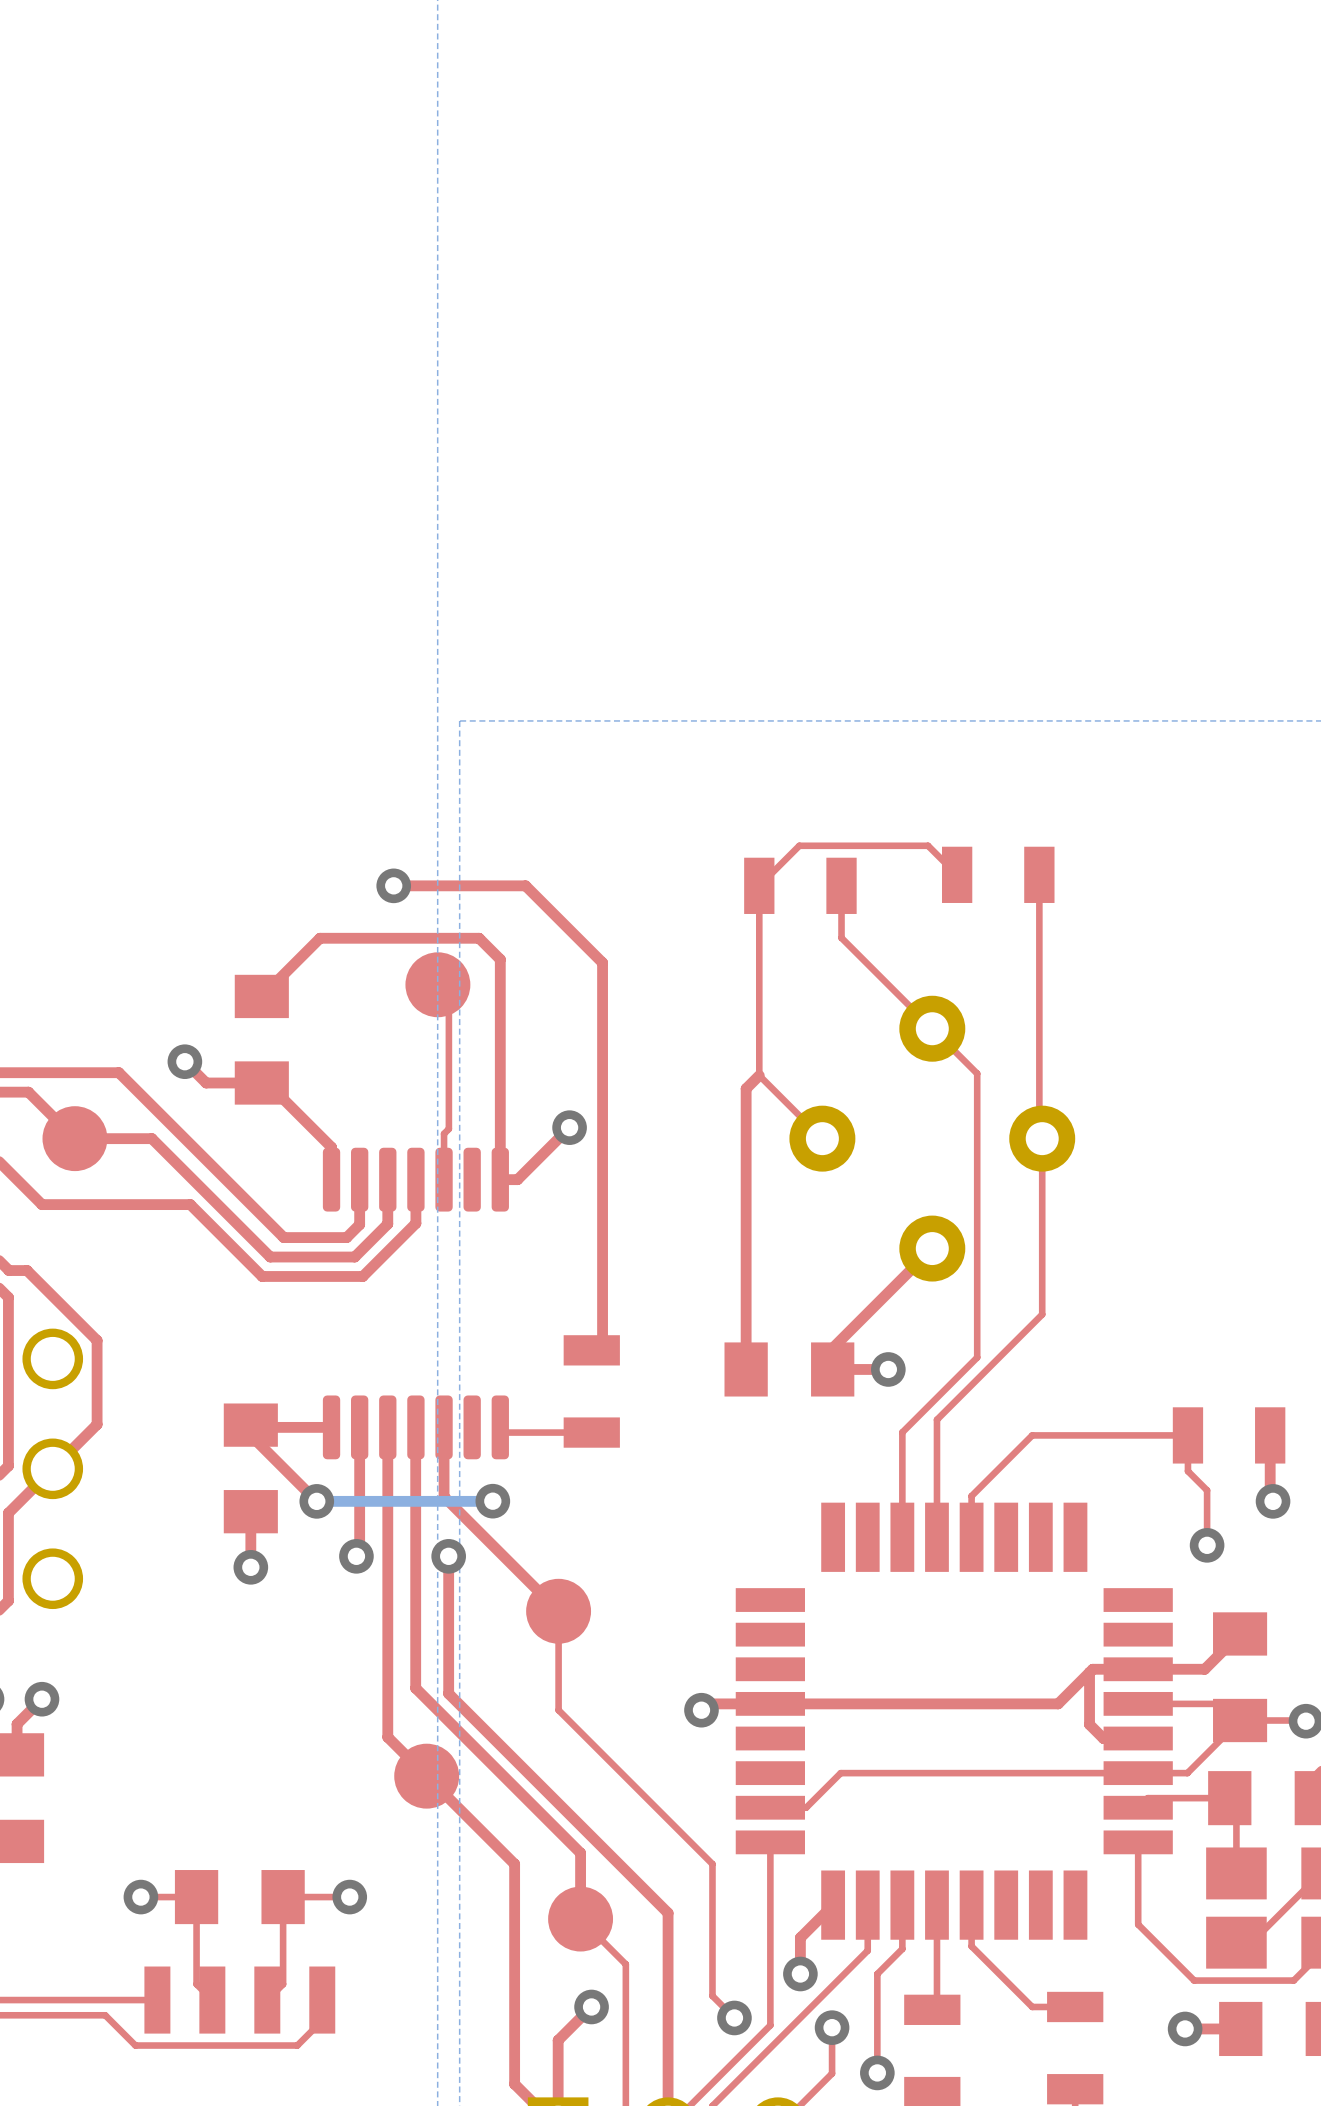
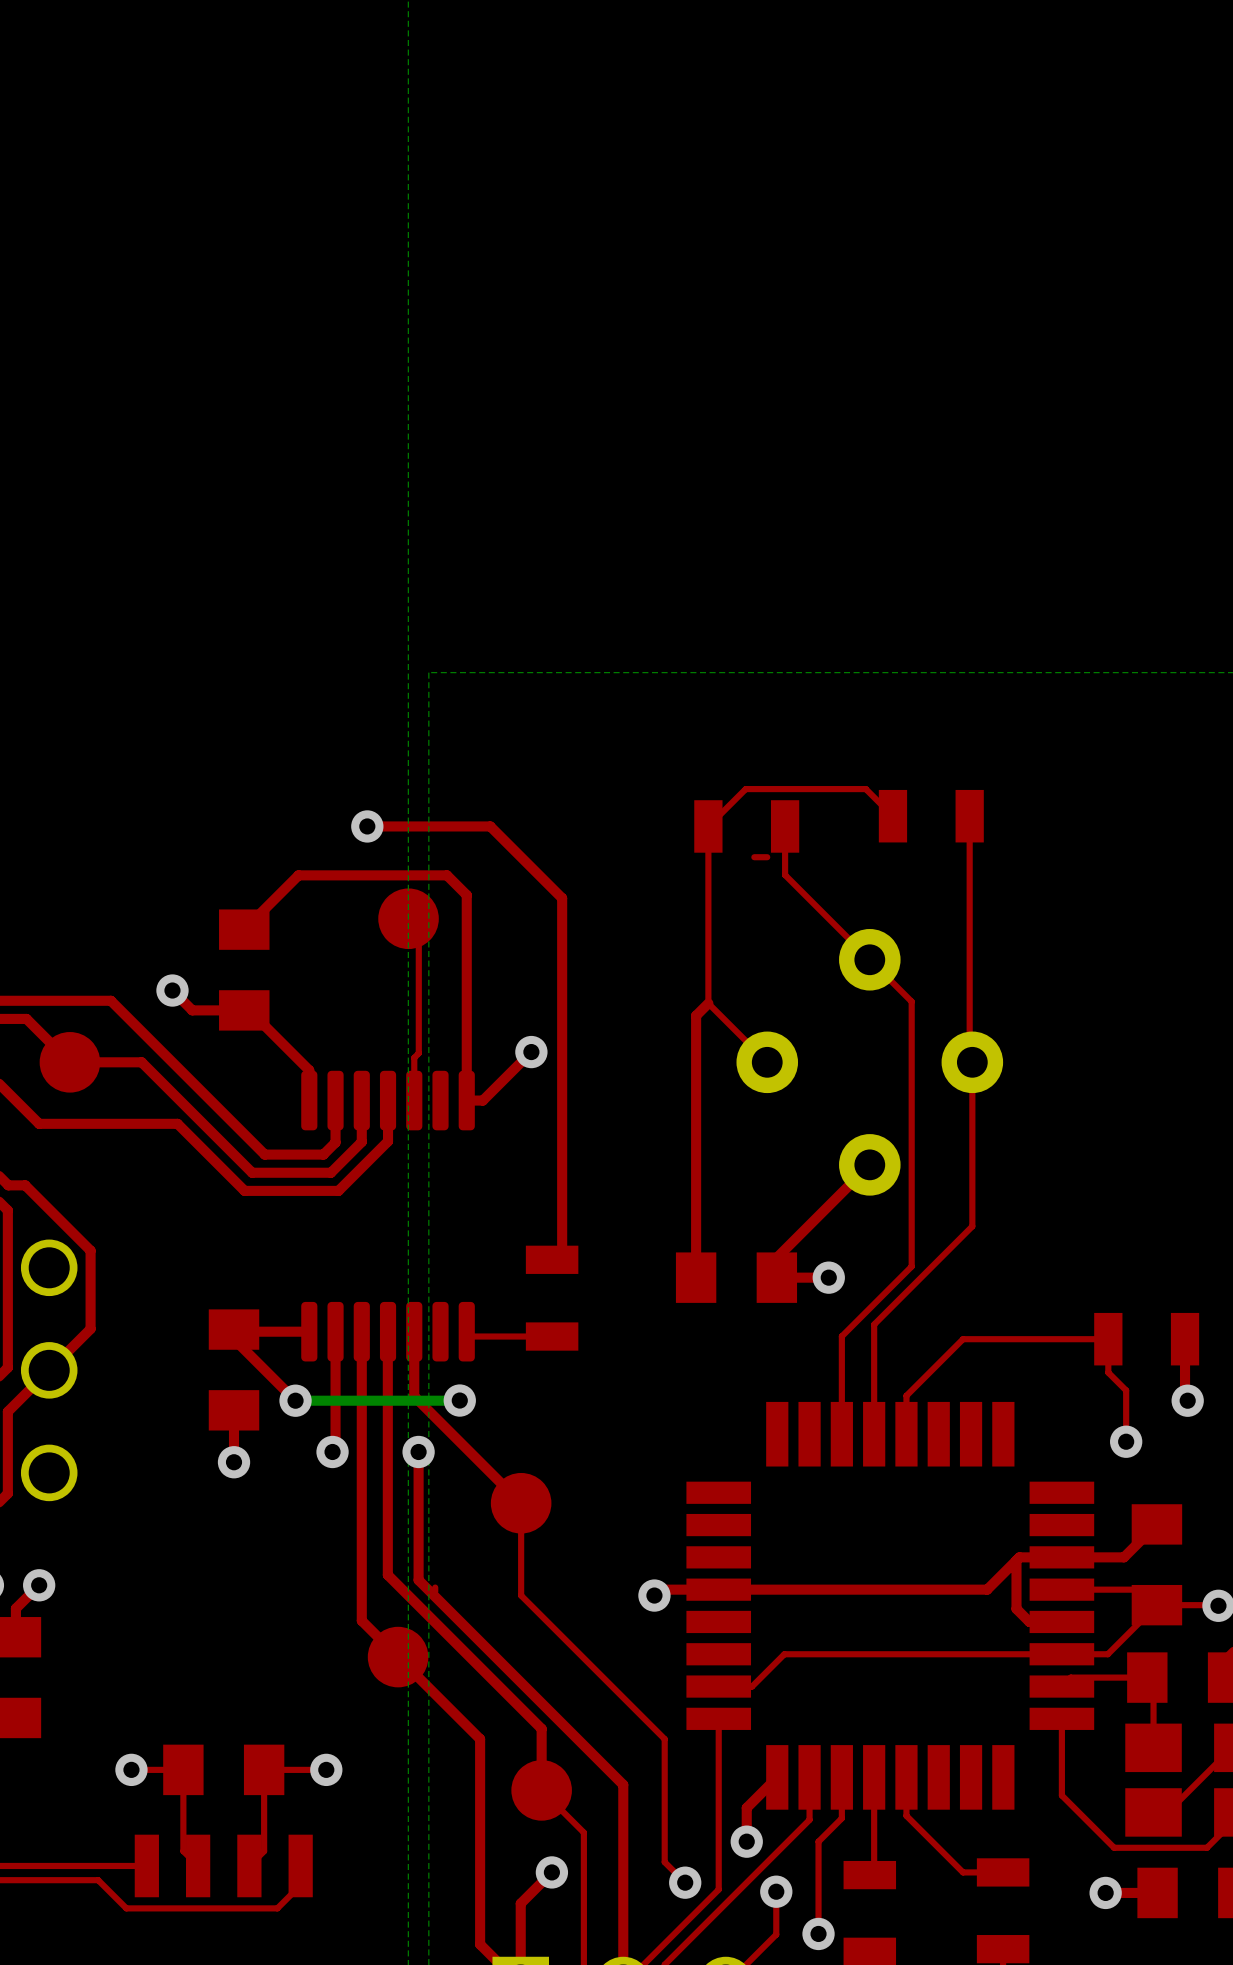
top track: none -> (767, 857) (754, 857)
top track: none -> (435, 1587) (435, 1591)

